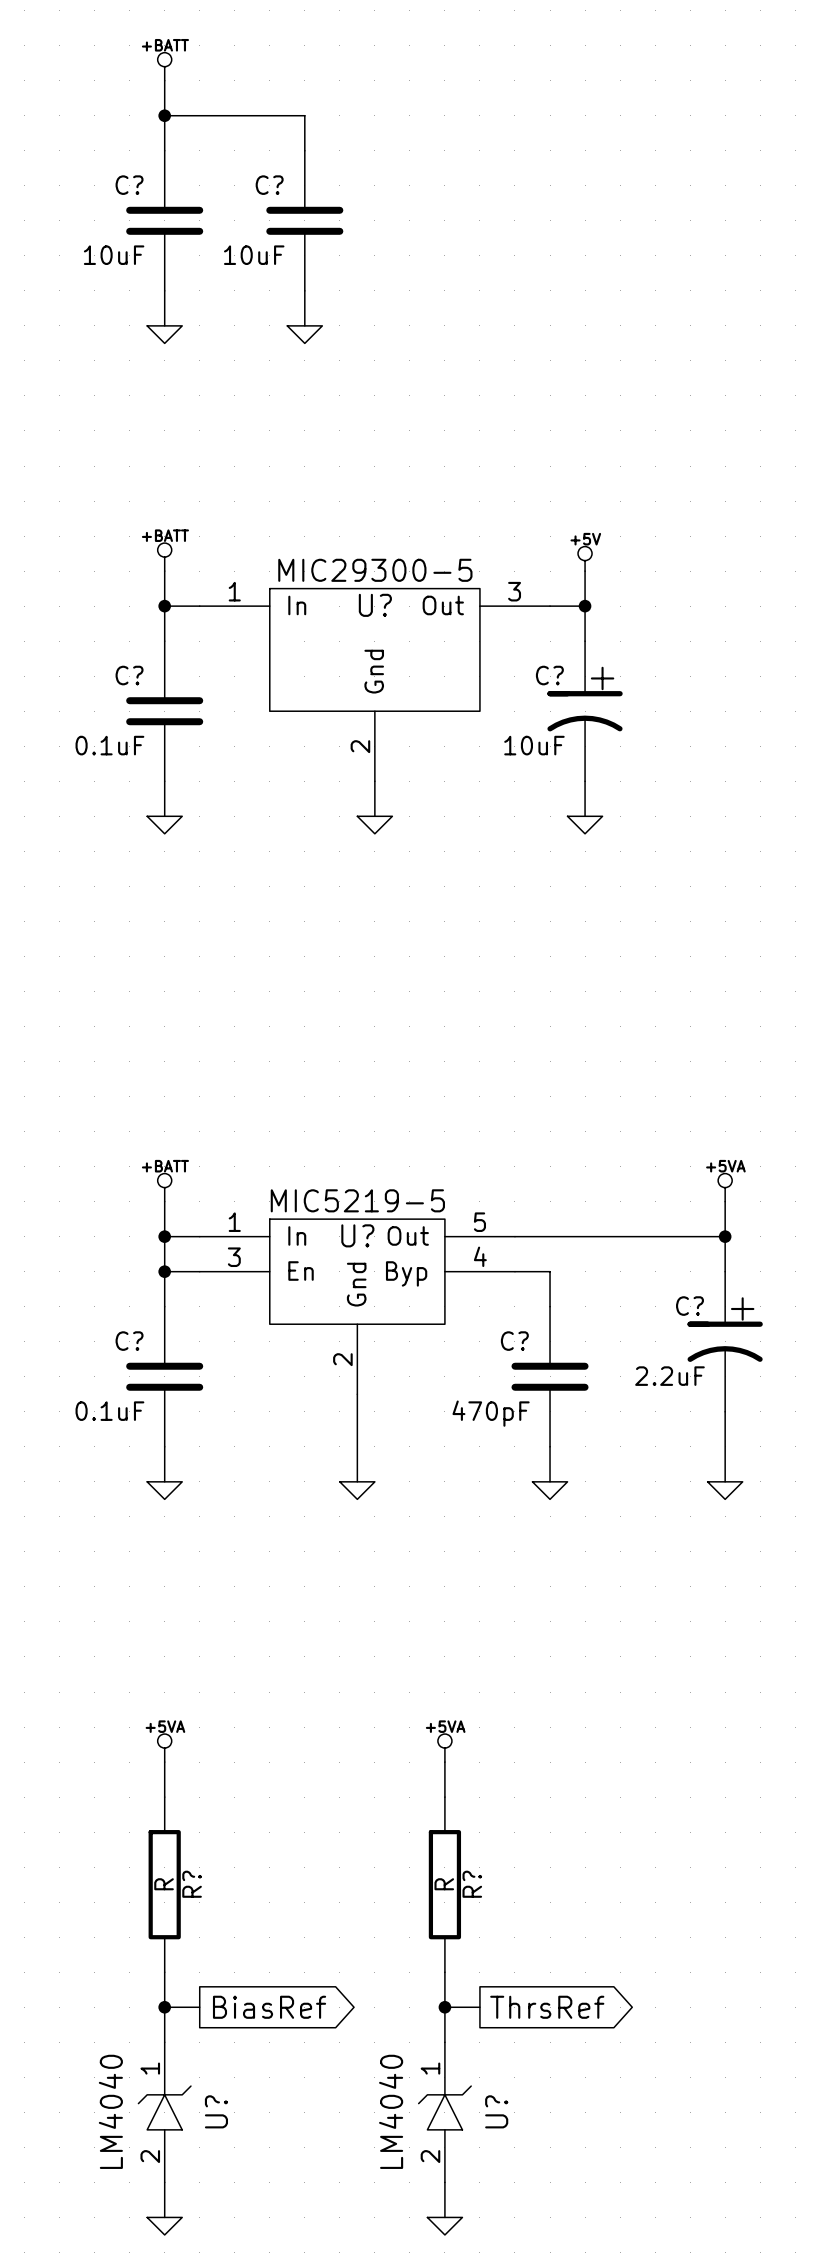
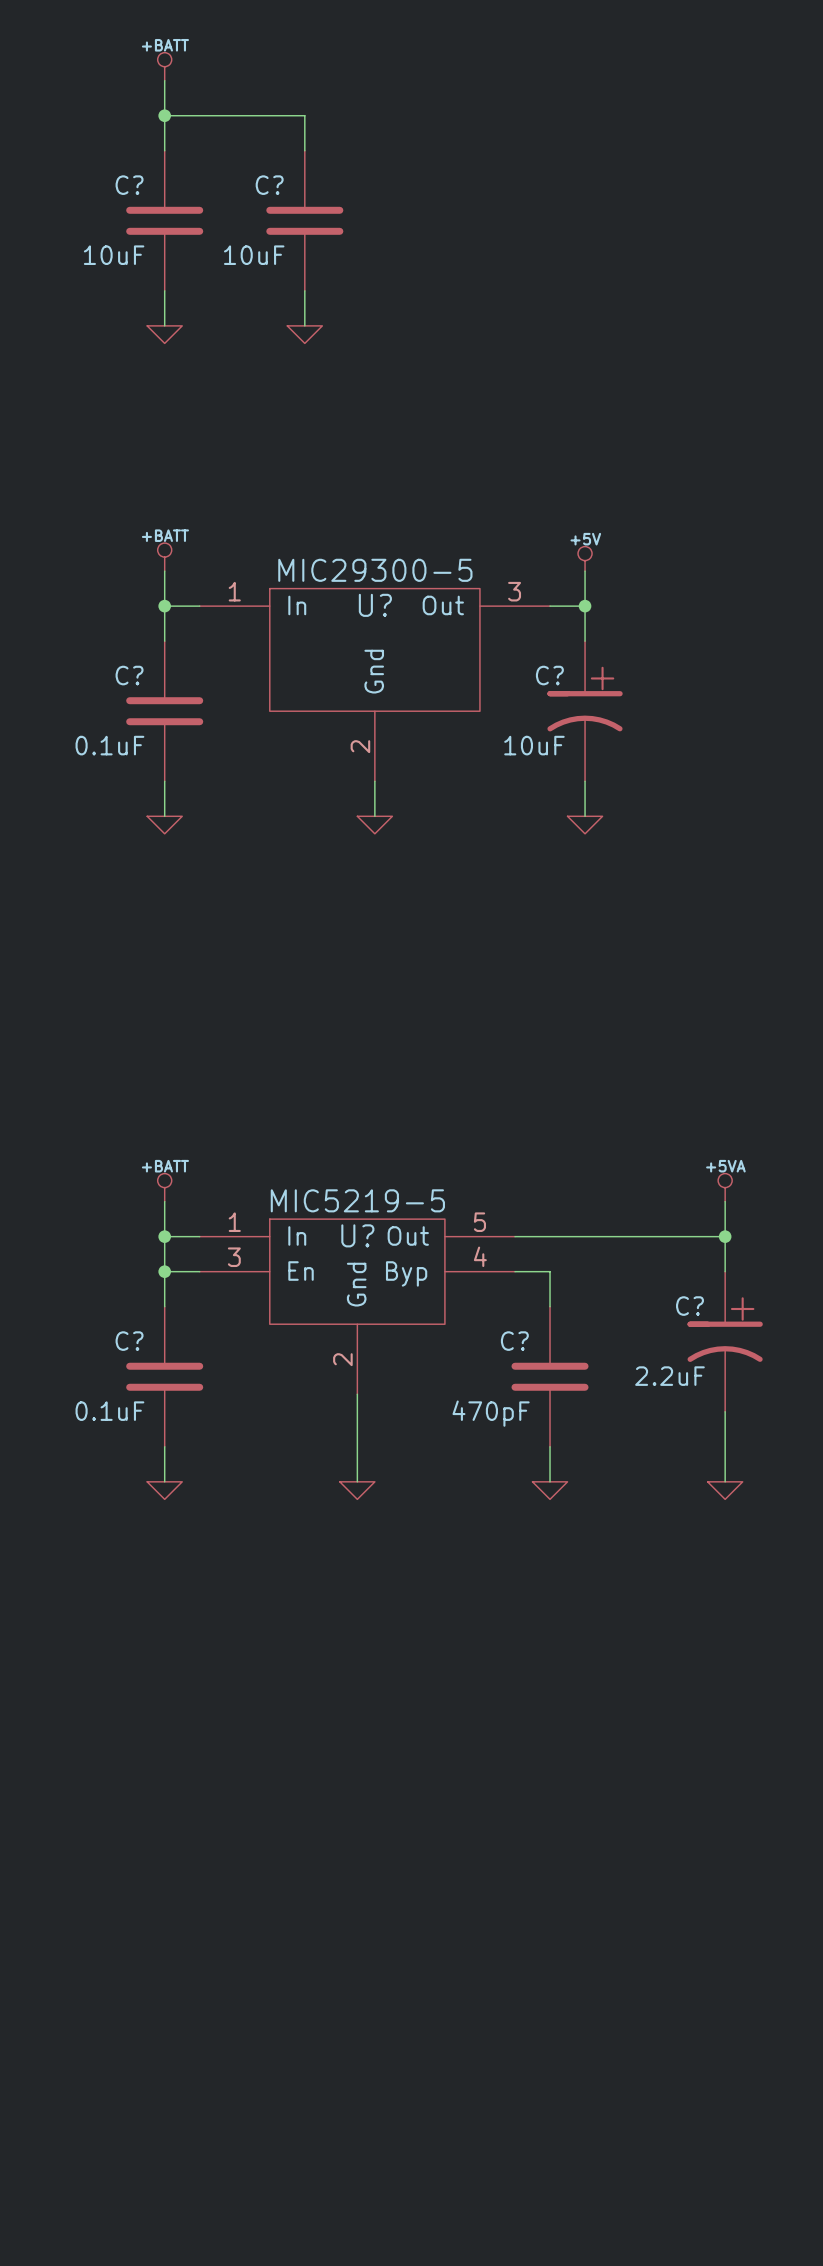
power symbol: +5VA (164, 1748) -> none
power symbol: +5VA (444, 1748) -> none
wire: (164, 1762) (164, 1797) -> none
wire: (444, 1762) (444, 1797) -> none
R?: R (164, 1884) -> none
R?: R (444, 1884) -> none
wire: (164, 1972) (164, 2042) -> none
wire: (444, 1972) (444, 2042) -> none
wire: (164, 2007) (199, 2007) -> none
junction: (164, 2007) -> none
global label: BiasRef (269, 2007) -> none
wire: (444, 2007) (479, 2007) -> none
junction: (444, 2007) -> none
global label: ThrsRef (547, 2007) -> none
U?: LM4040 (164, 2112) -> none
U?: LM4040 (444, 2112) -> none
wire: (164, 2182) (164, 2217) -> none
wire: (444, 2182) (444, 2217) -> none
power symbol: (164, 2226) -> none
power symbol: (444, 2226) -> none

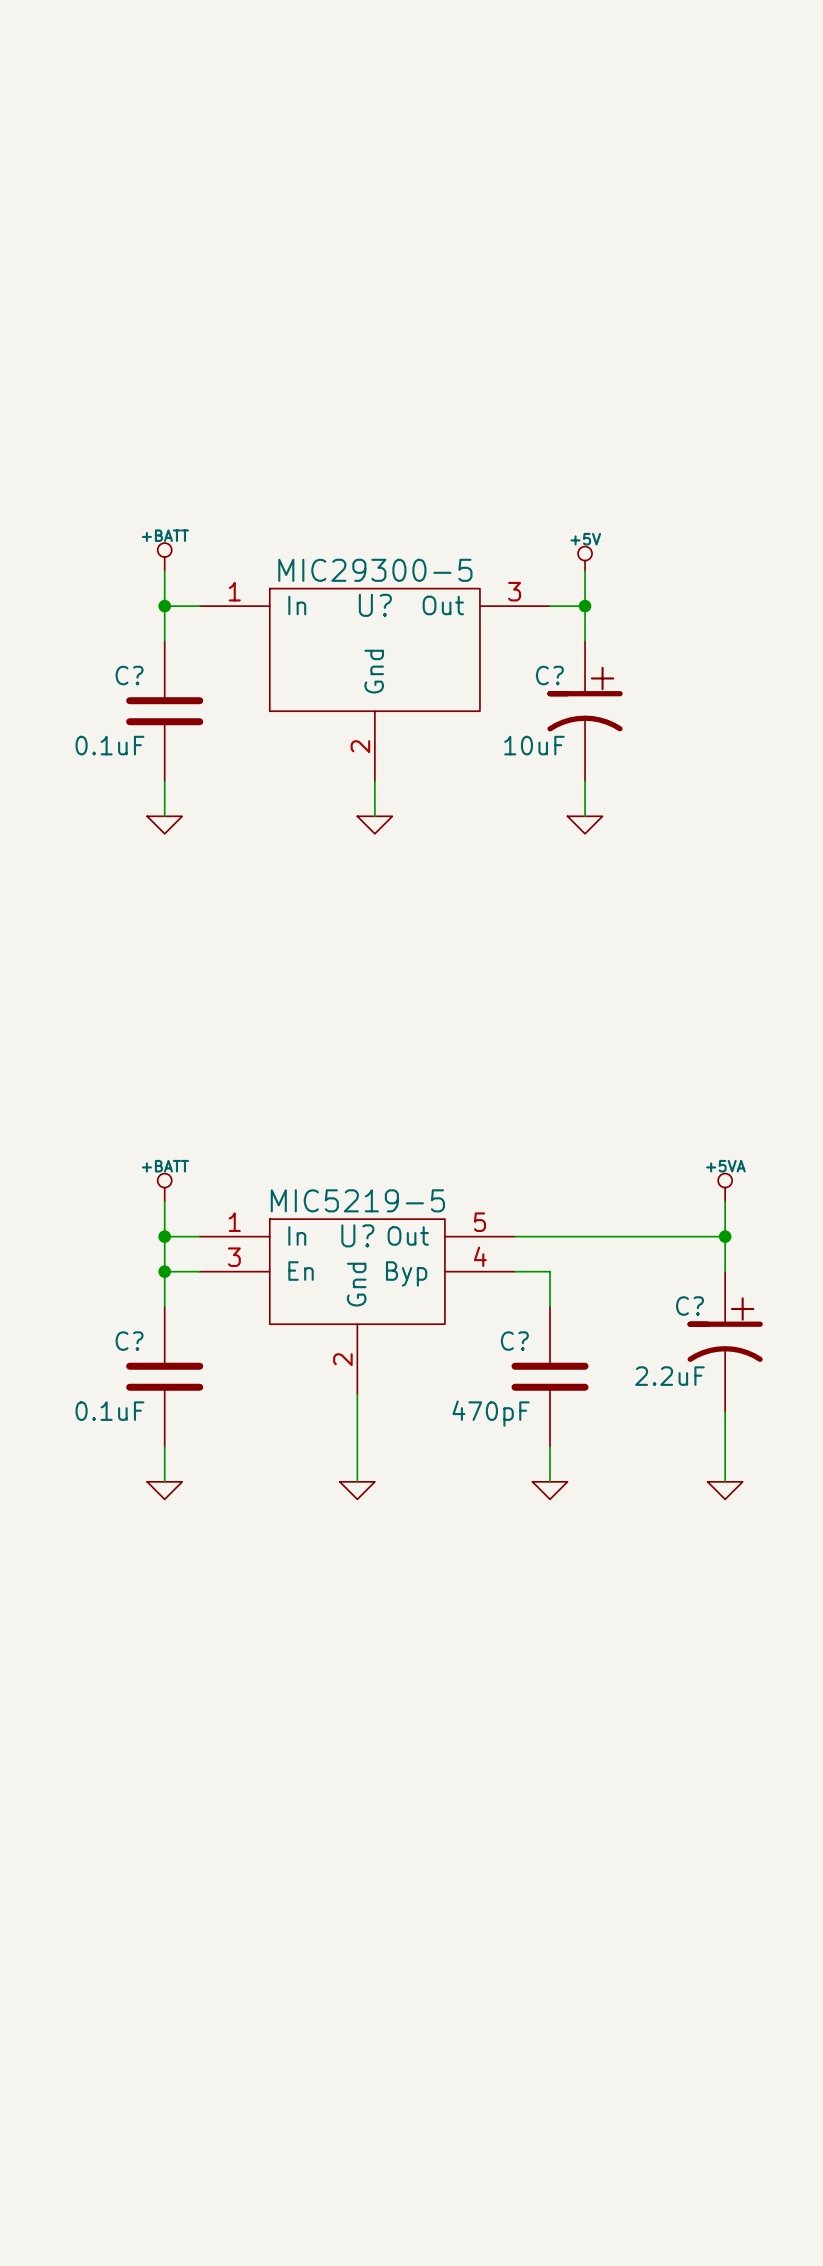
power symbol: +BATT (164, 66) -> none
wire: (164, 80) (164, 150) -> none
wire: (164, 115) (304, 115) (304, 150) -> none
junction: (164, 115) -> none
C?: 10uF (164, 220) -> none
C?: 10uF (304, 220) -> none
wire: (164, 290) (164, 325) -> none
wire: (304, 290) (304, 325) -> none
power symbol: (164, 334) -> none
power symbol: (304, 334) -> none

